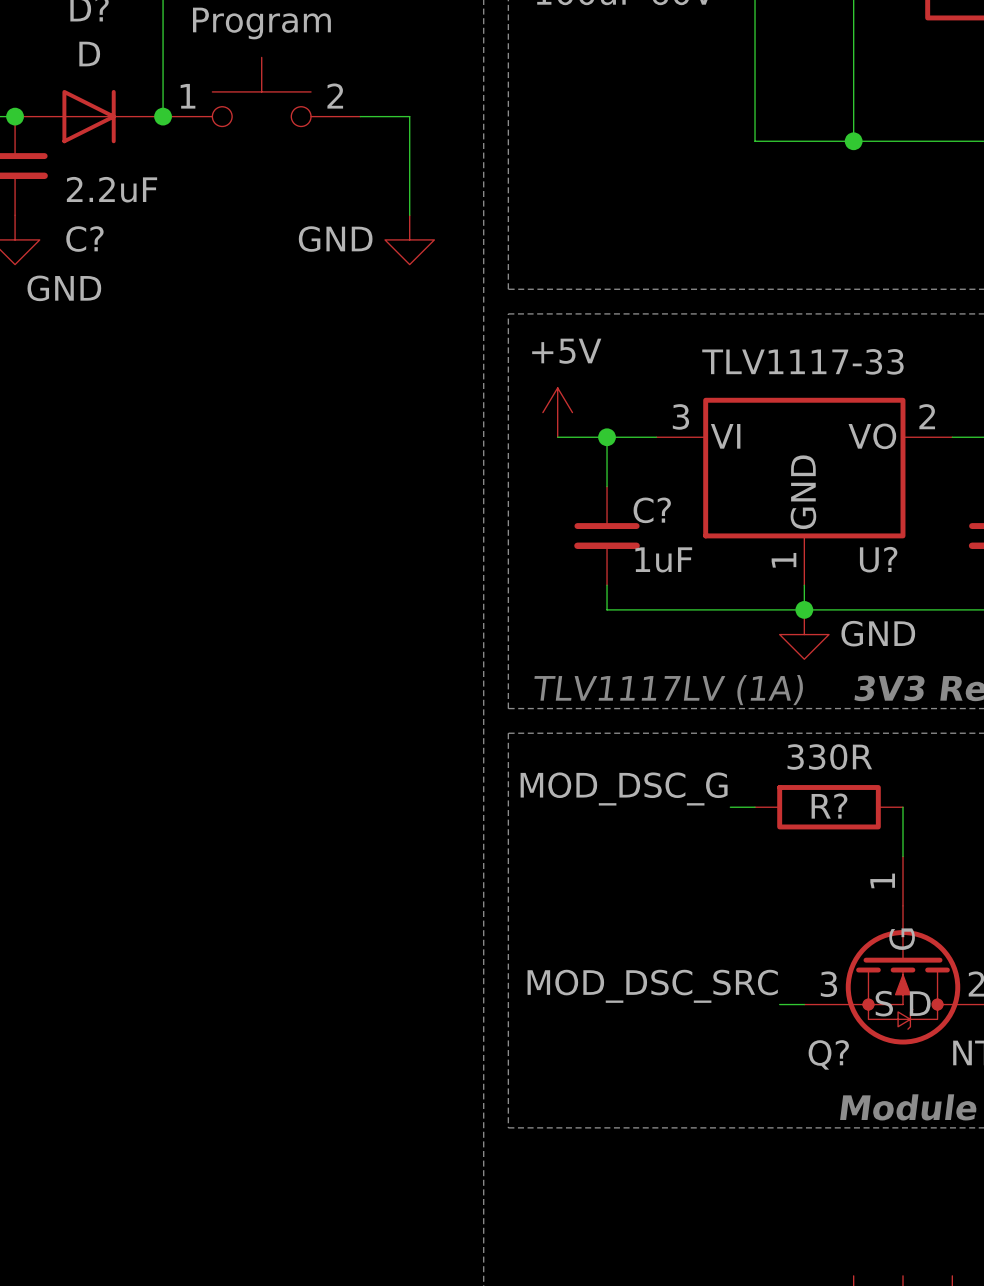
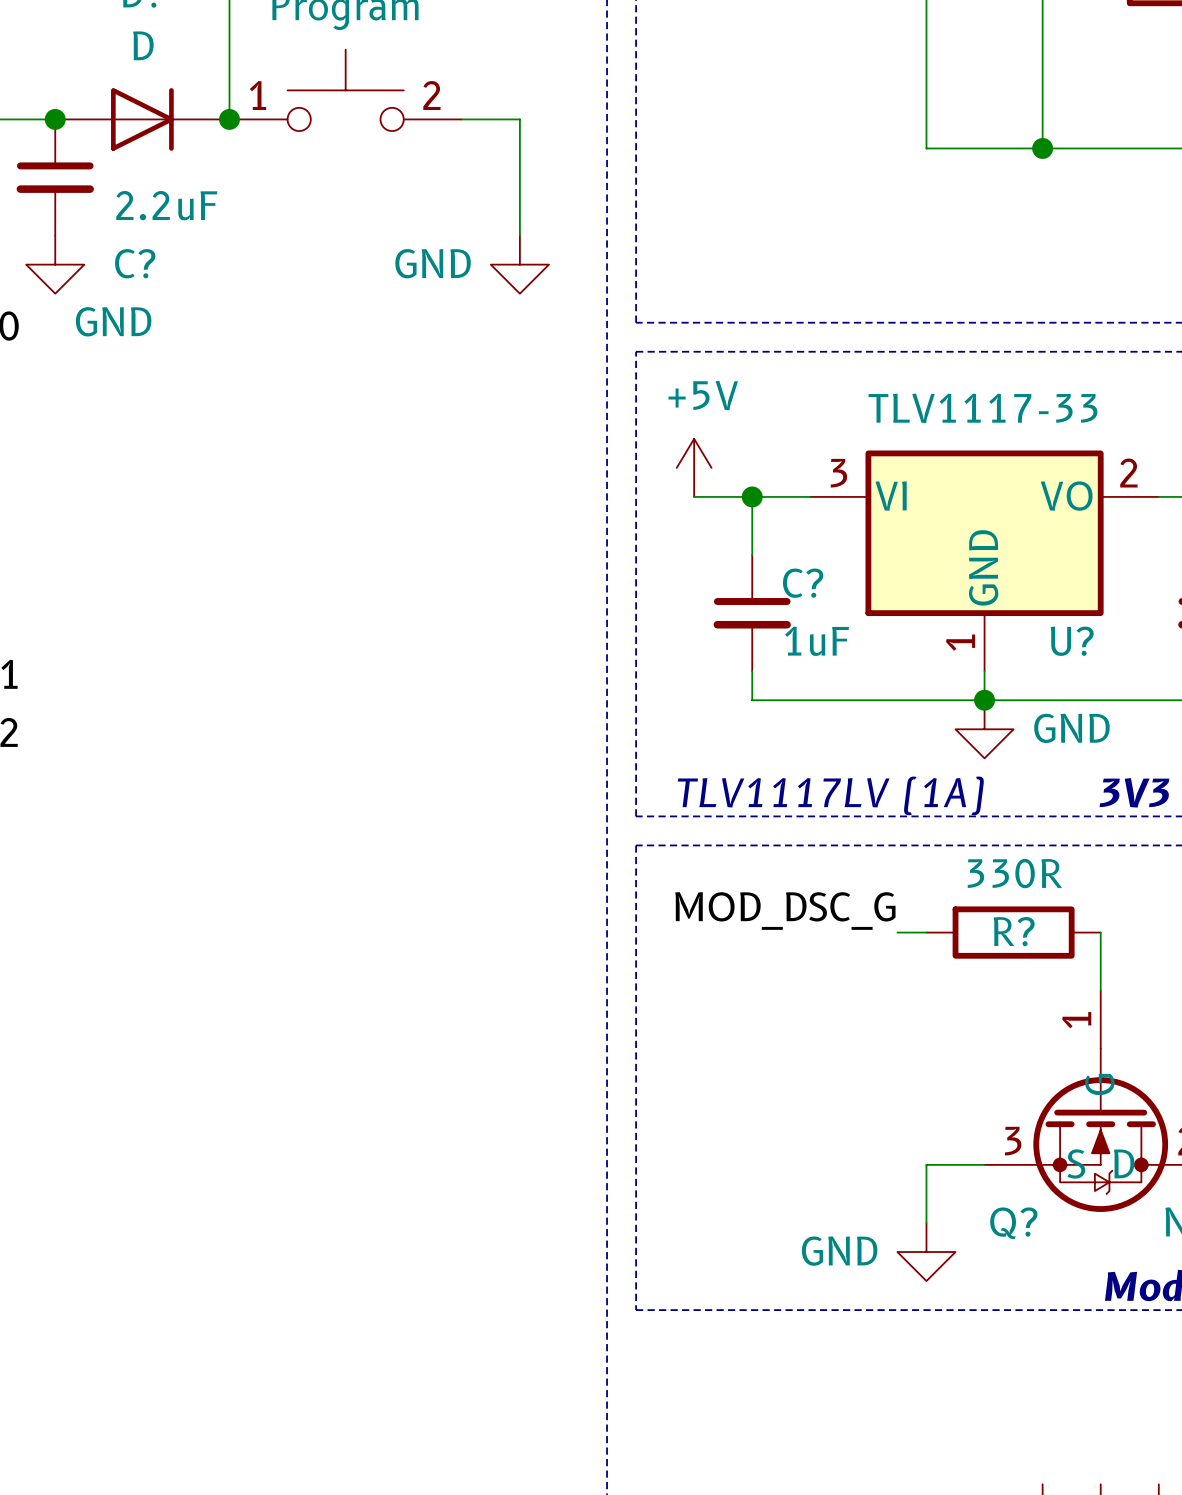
label: MOD_DSC_SRC (652, 986) -> none
wire: none -> (955, 1164) (926, 1164) (926, 1222)
power symbol: none -> GND (926, 1252)

